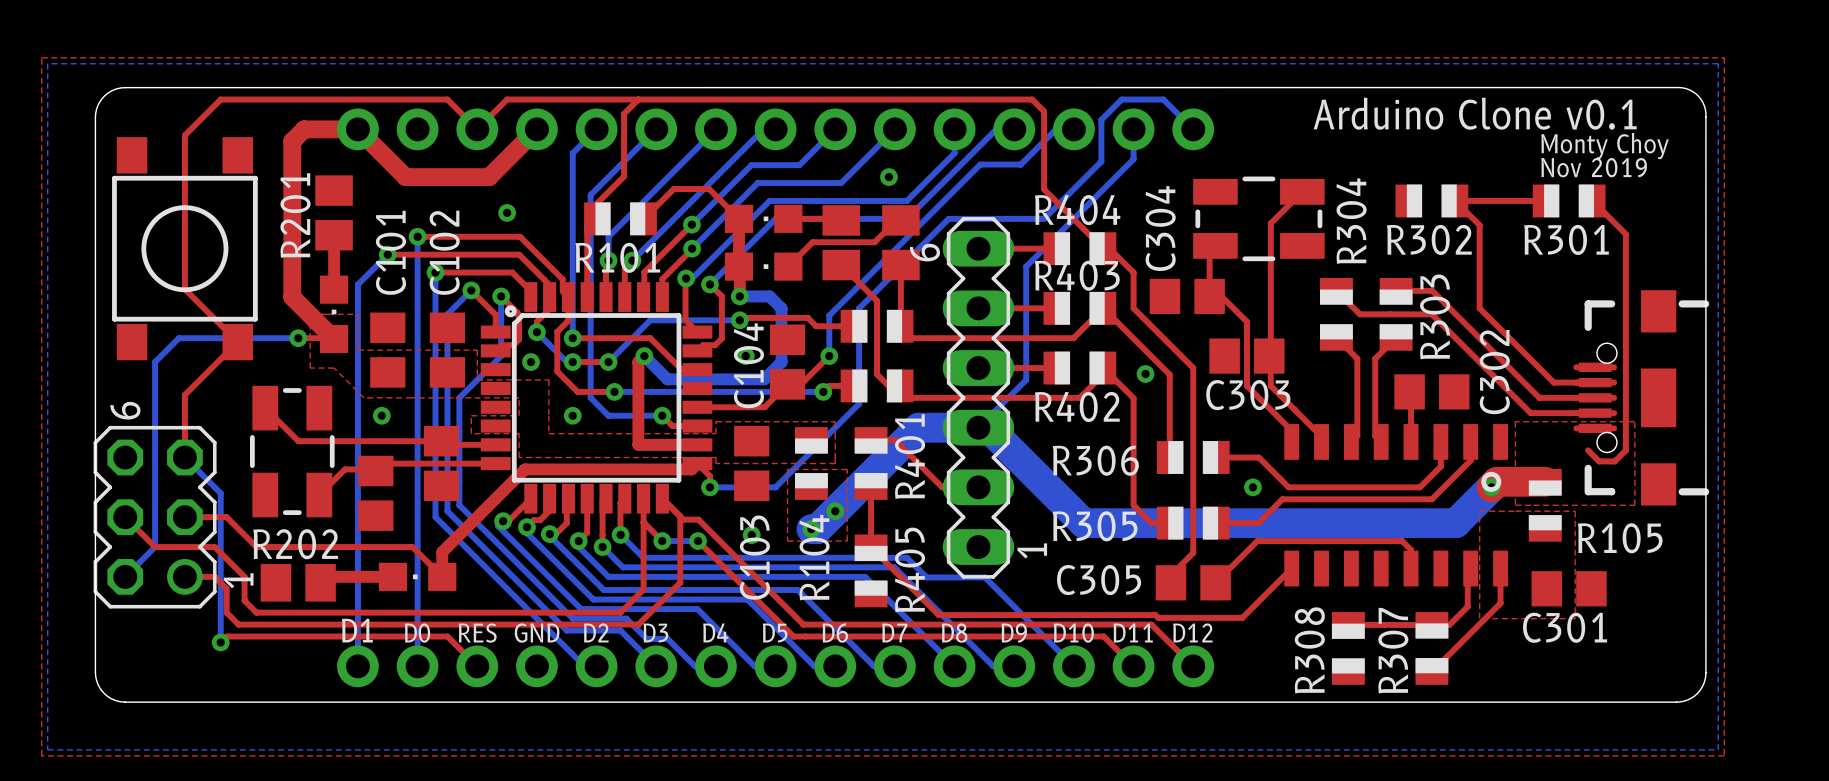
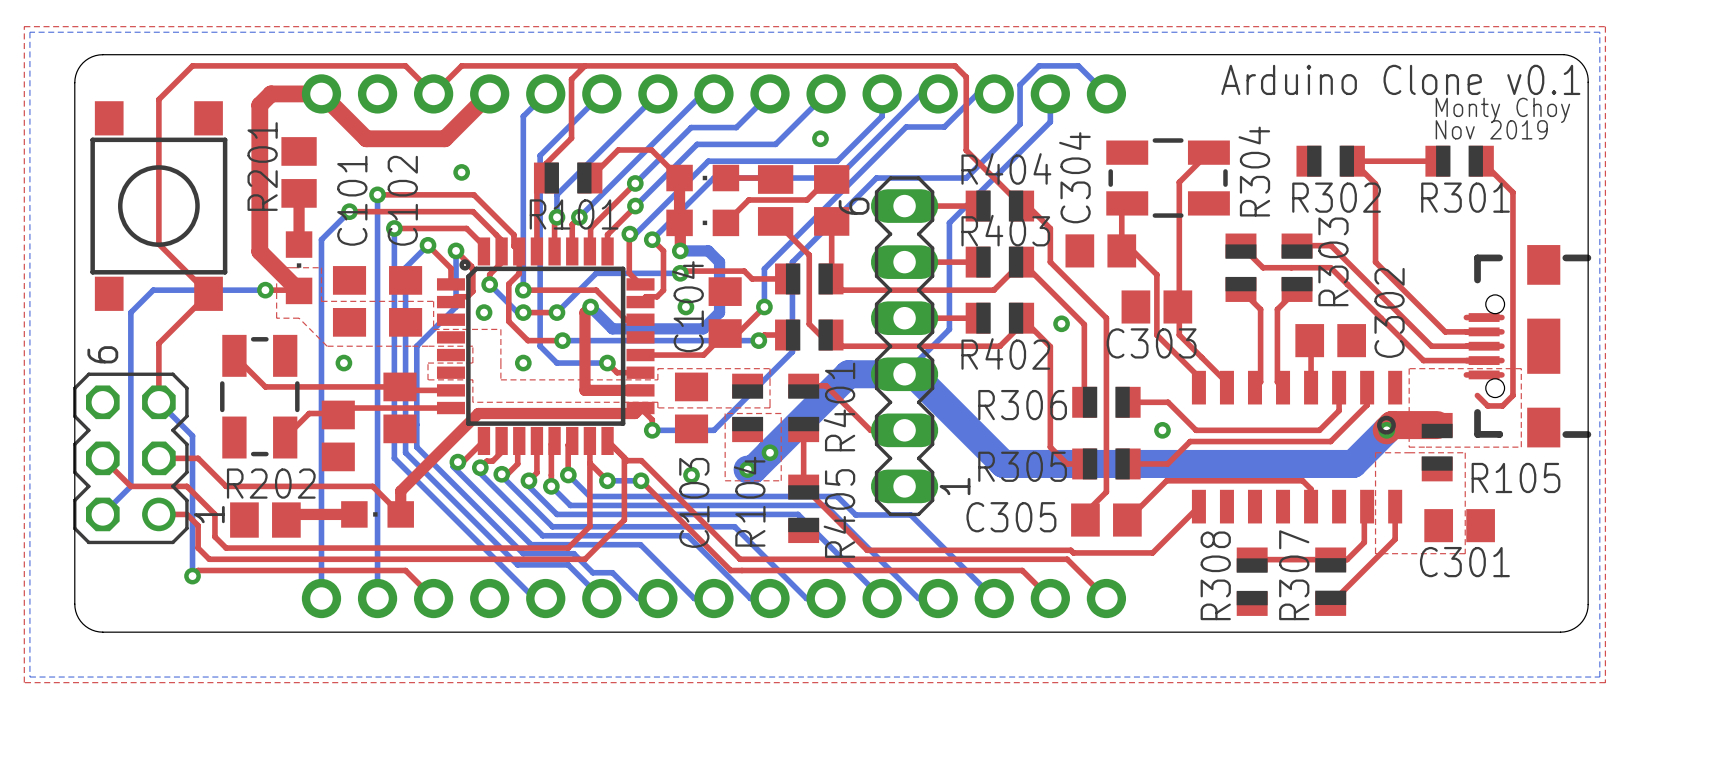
text: D1 (357, 630) -> none
text: D2 (596, 632) -> none
text: D4 (715, 632) -> none
text: D11 (1133, 632) -> none
text: D12 (1192, 632) -> none
text: D0 (417, 633) -> none
text: RES (477, 633) -> none
text: GND (537, 633) -> none
text: D3 (655, 633) -> none
text: D5 (775, 633) -> none
text: D6 (835, 633) -> none
text: D7 (894, 633) -> none
text: D8 (954, 633) -> none
text: D9 (1014, 633) -> none
text: D10 (1073, 633) -> none

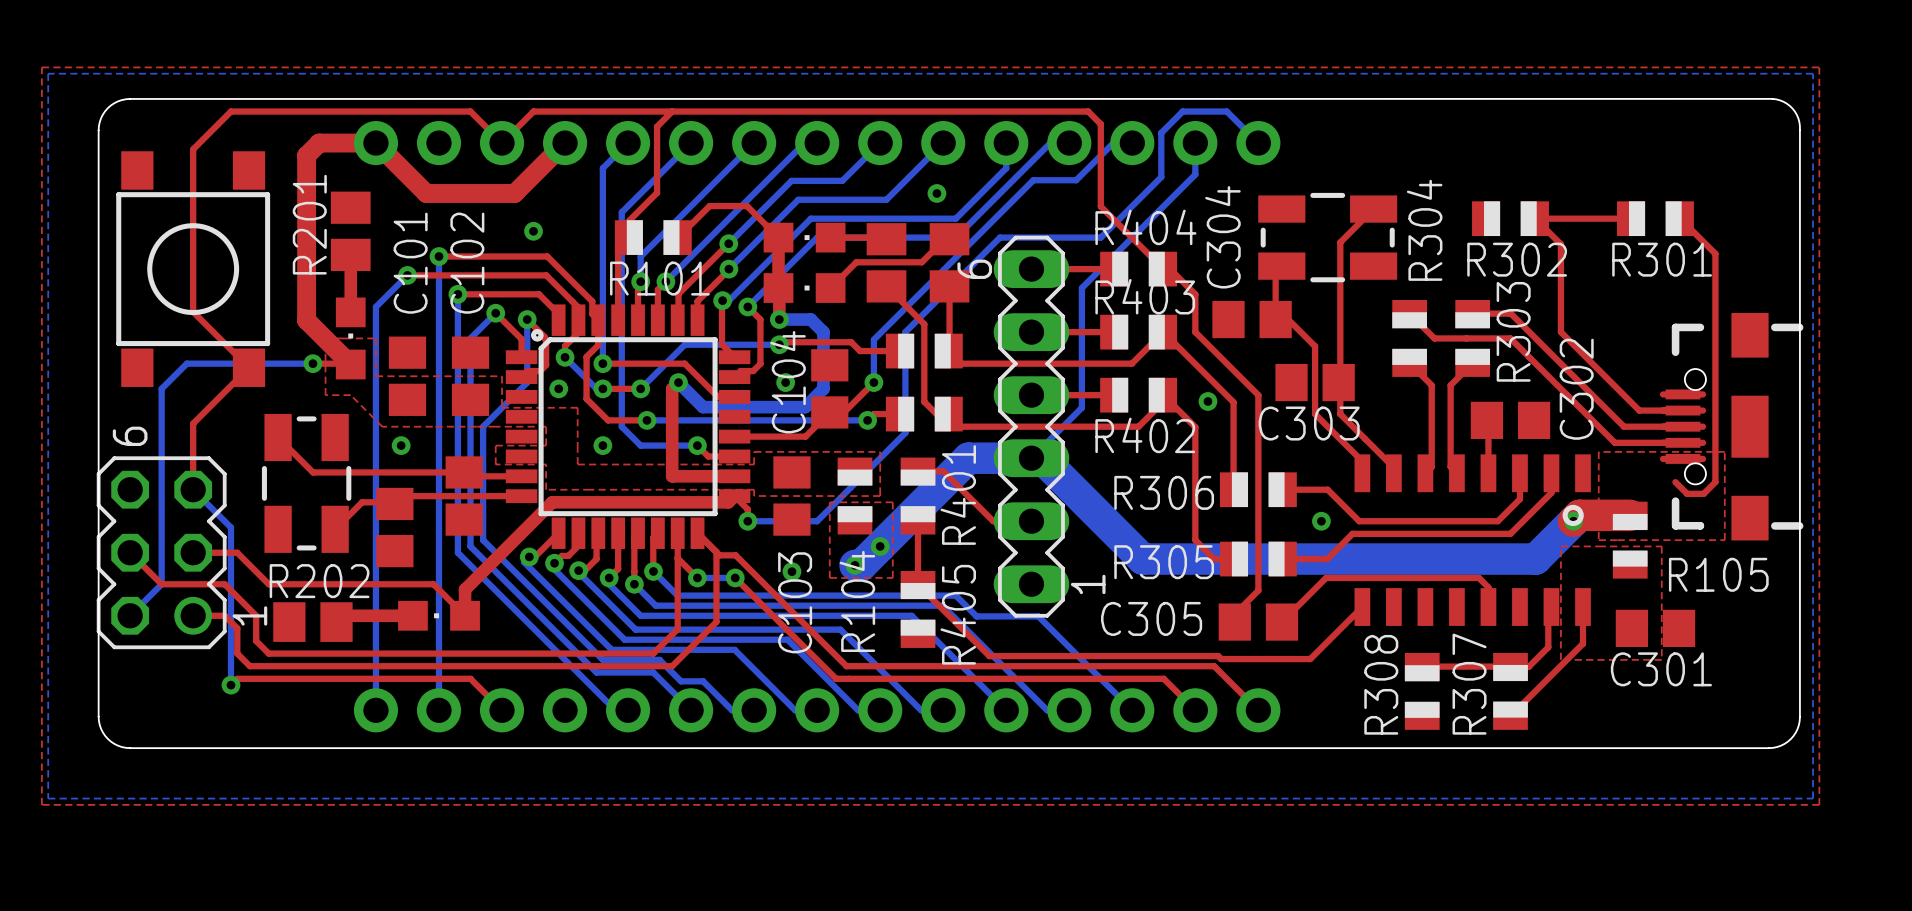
text: Arduino Clone v0.1 (1400, 79) -> none
text: Monty Choy (1502, 110) -> none
text: Nov 2019 (1491, 129) -> none

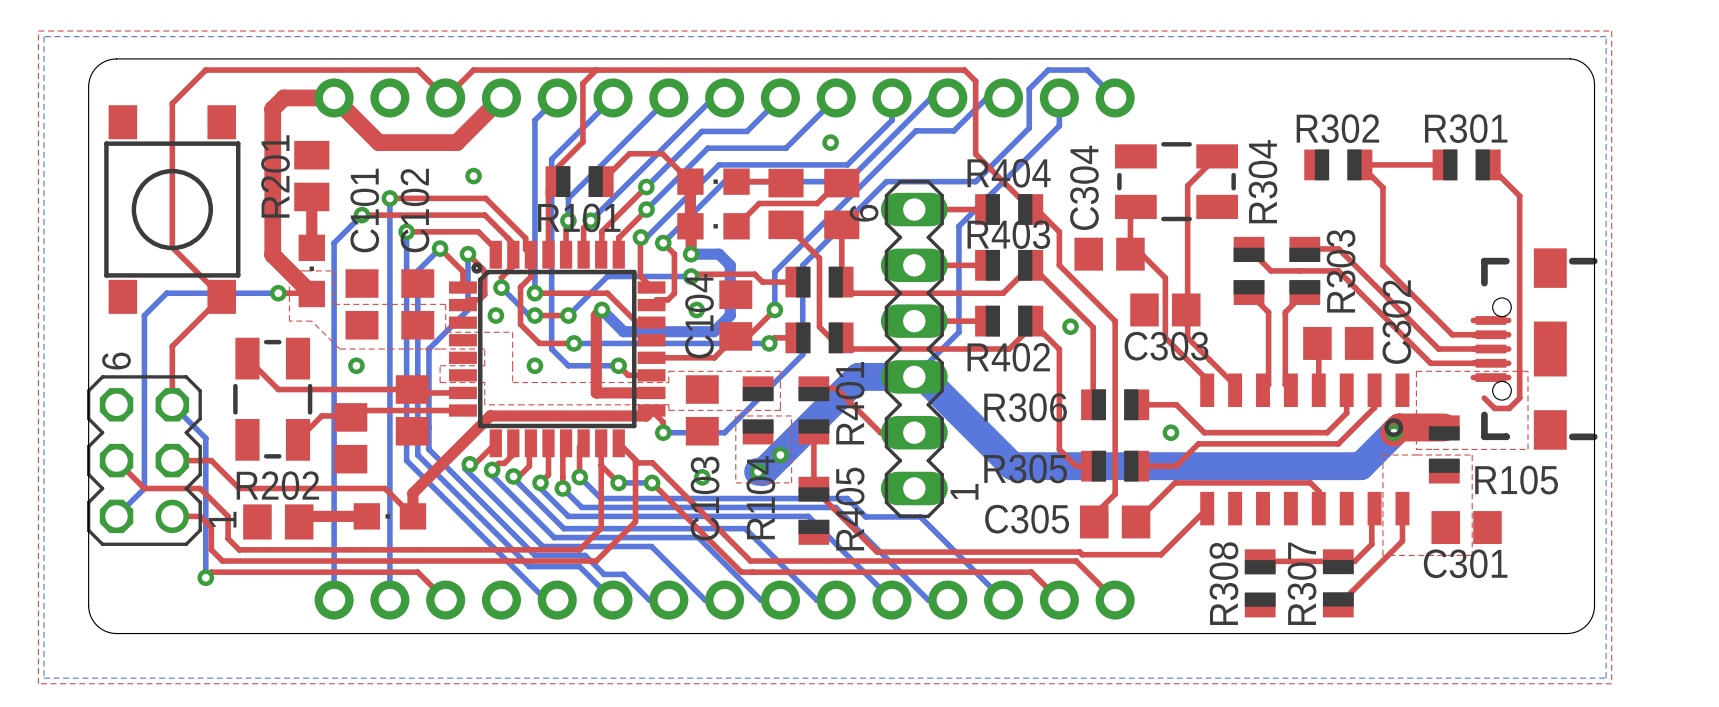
R302 name position: R302 (1517, 259) -> R302 (1337, 128)
R301 name position: R301 (1662, 259) -> R301 (1466, 128)

